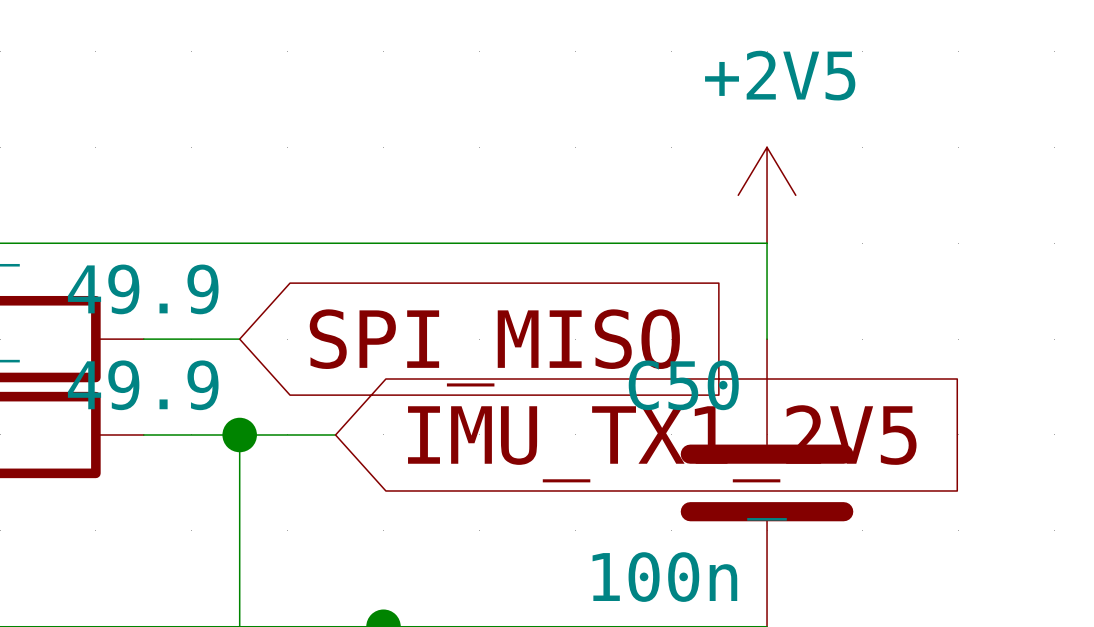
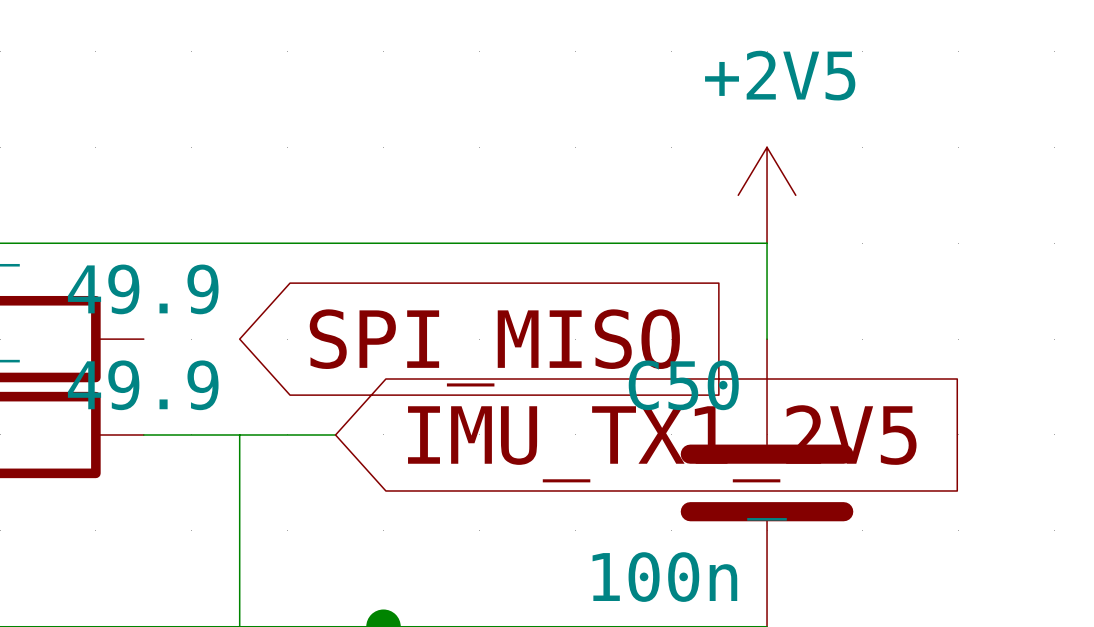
wire: (143, 339) (239, 339) -> none
junction: (239, 434) -> none

